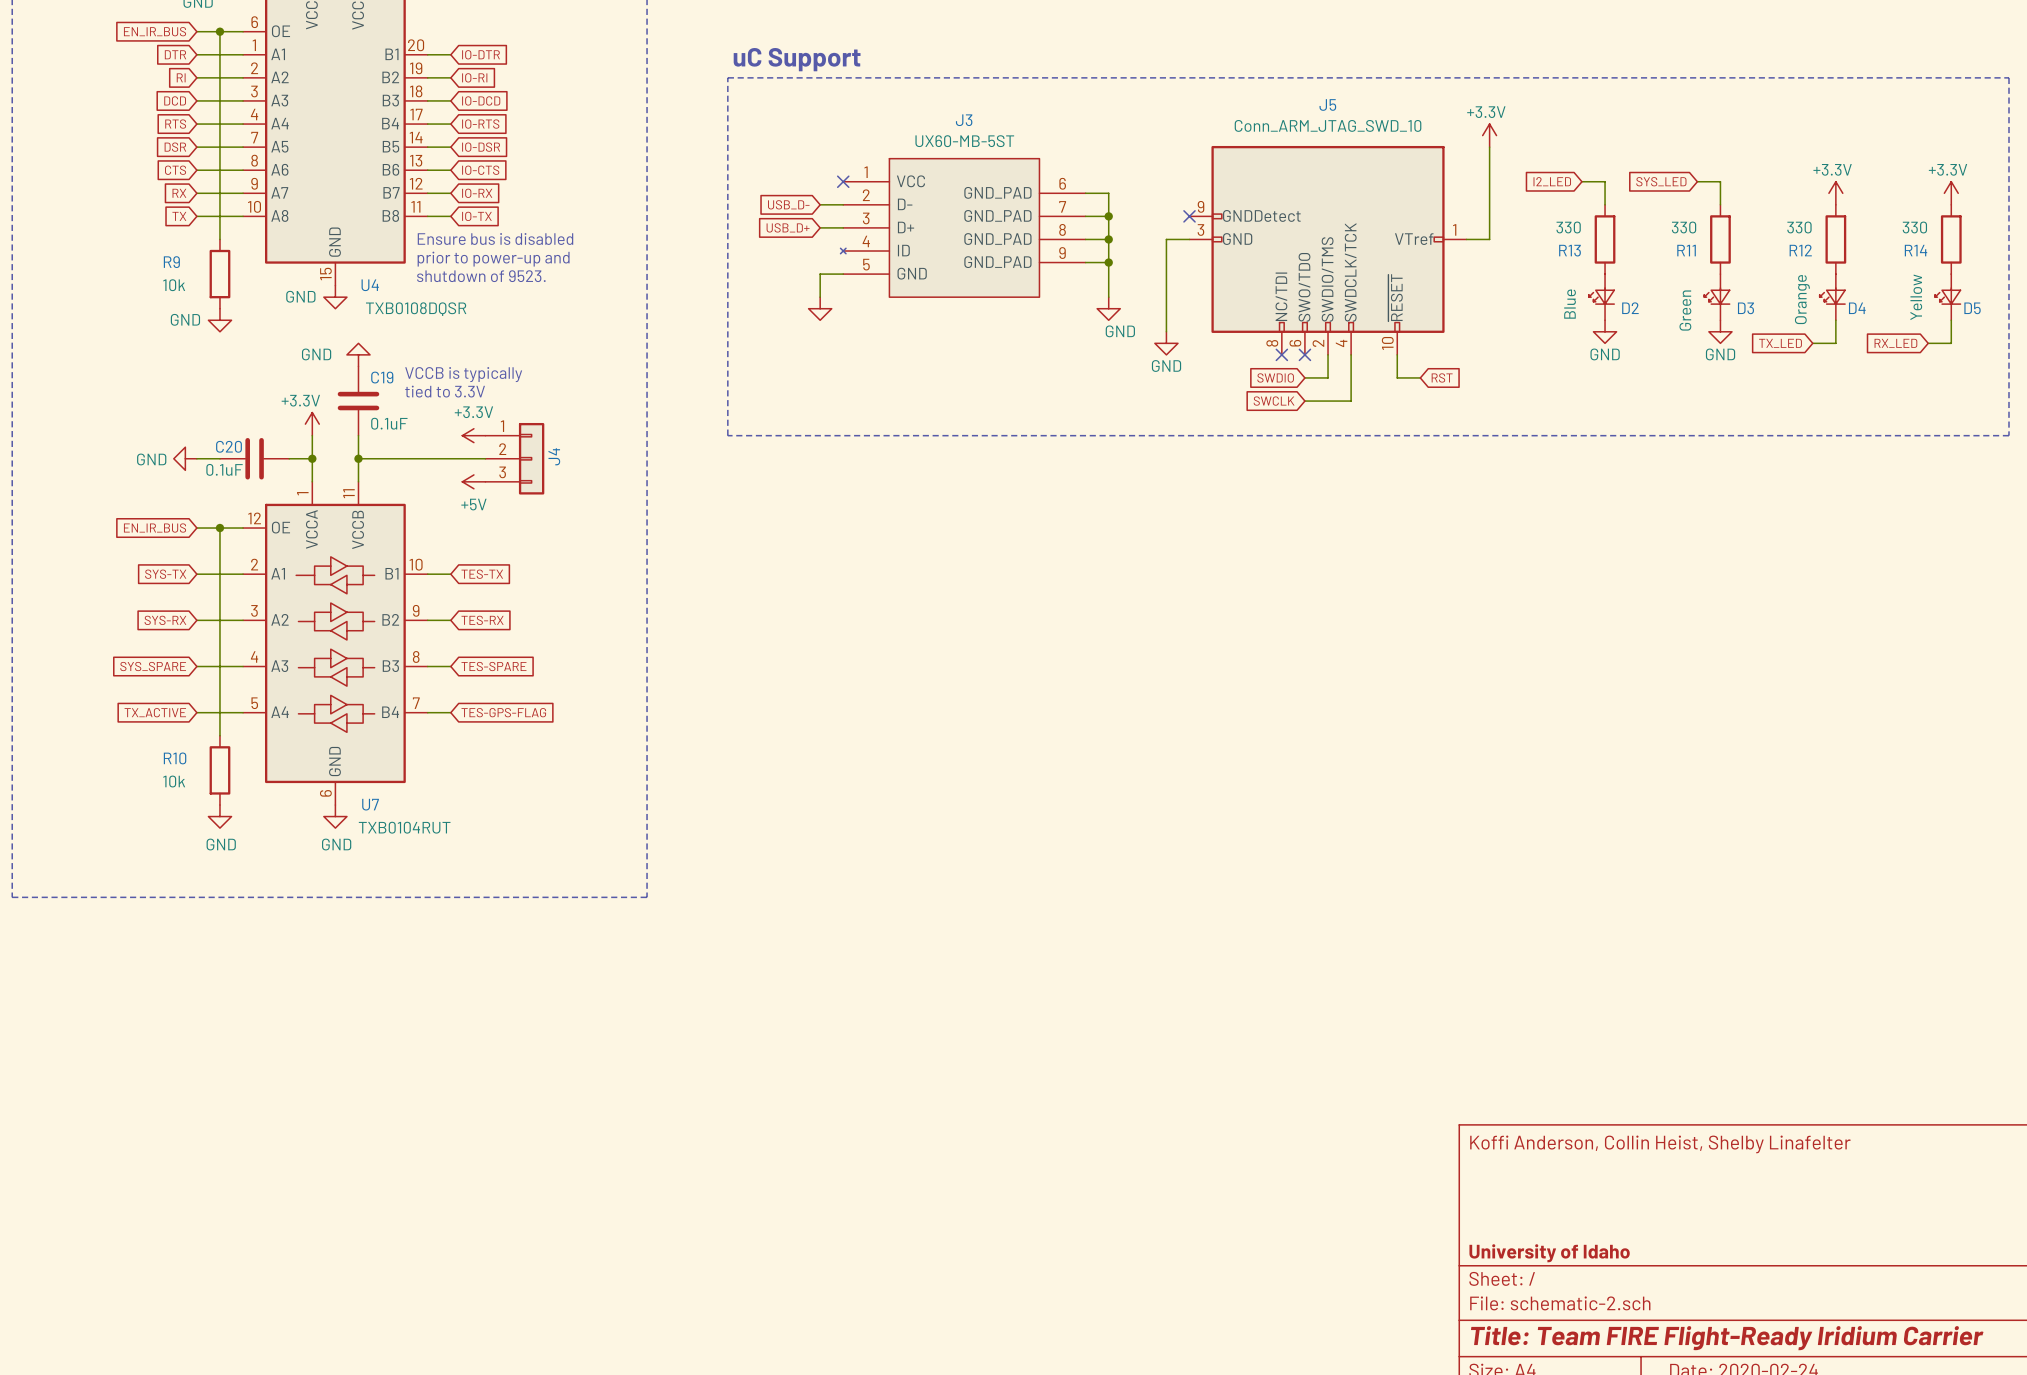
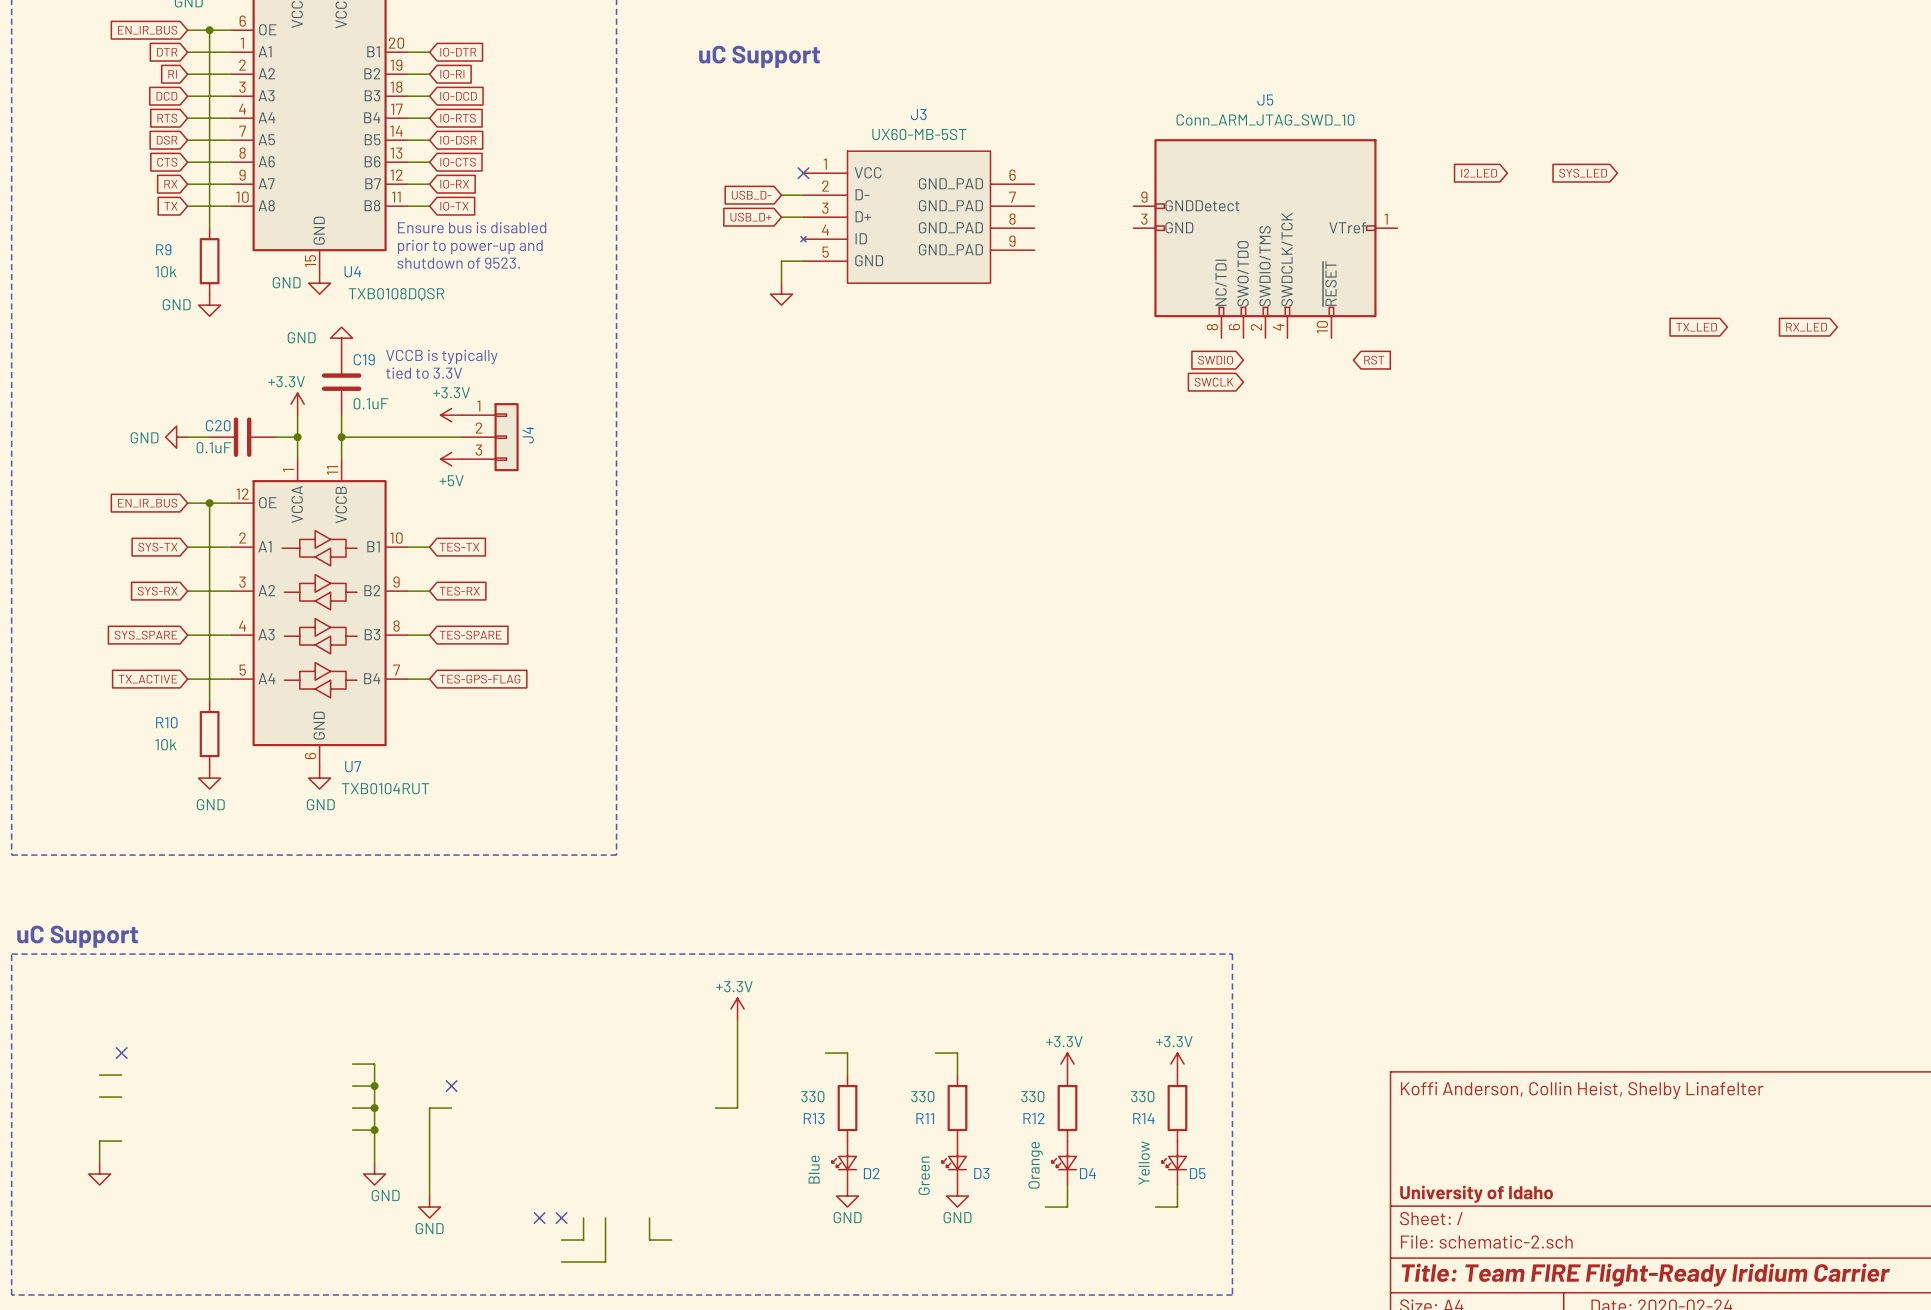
line: (727, 77) (727, 435) (2008, 435) (2008, 77) (727, 77) -> none
power symbol: +3.3V (1489, 135) -> none
wire: (1489, 147) (1489, 239) (1466, 239) -> none
wire: (1581, 181) (1605, 181) (1605, 204) -> none
wire: (1697, 181) (1720, 181) (1720, 204) -> none
wire: (1085, 193) (1108, 193) (1108, 297) -> none
power symbol: +3.3V (1835, 193) -> none
power symbol: +3.3V (1951, 193) -> none
wire: (1085, 216) (1108, 216) -> none
junction: (1108, 216) -> none
no-connect mark: (1189, 216) -> none
wire: (1085, 239) (1108, 239) -> none
junction: (1108, 239) -> none
wire: (1189, 239) (1166, 239) (1166, 331) -> none
R13 position: (1605, 239) -> (847, 1108)
R11 position: (1720, 239) -> (957, 1108)
R12 position: (1835, 239) -> (1067, 1108)
R14 position: (1951, 239) -> (1177, 1108)
wire: (1085, 262) (1108, 262) -> none
junction: (1108, 262) -> none
D2 position: (1601, 297) -> (844, 1163)
D3 position: (1716, 297) -> (954, 1163)
D4 position: (1832, 297) -> (1064, 1163)
D5 position: (1947, 297) -> (1174, 1163)
power symbol: GND (1108, 308) -> none
wire: (1835, 320) (1835, 343) (1812, 343) -> none
wire: (1951, 320) (1951, 343) (1928, 343) -> none
power symbol: GND (1605, 331) -> none
power symbol: GND (1720, 331) -> none
power symbol: GND (1166, 343) -> none
no-connect mark: (1281, 354) -> none
no-connect mark: (1304, 354) -> none
wire: (1328, 354) (1328, 377) (1304, 377) -> none
wire: (1351, 354) (1351, 401) (1304, 401) -> none
wire: (1397, 354) (1397, 377) (1420, 377) -> none
text: none -> uC Support (77, 936)
line: none -> (11, 954) (11, 1295) (1232, 1295) (1232, 954) (11, 954)
power symbol: none -> +3.3V (737, 1009)
wire: none -> (737, 1020) (737, 1108) (715, 1108)
no-connect mark: none -> (121, 1053)
wire: none -> (825, 1053) (847, 1053) (847, 1075)
wire: none -> (935, 1053) (957, 1053) (957, 1075)
wire: none -> (352, 1064) (374, 1064) (374, 1163)
power symbol: none -> +3.3V (1067, 1064)
power symbol: none -> +3.3V (1177, 1064)
wire: none -> (99, 1075) (121, 1075)
wire: none -> (352, 1086) (374, 1086)
junction: none -> (374, 1086)
no-connect mark: none -> (451, 1086)
wire: none -> (99, 1097) (121, 1097)
wire: none -> (352, 1108) (374, 1108)
junction: none -> (374, 1108)
wire: none -> (451, 1108) (429, 1108) (429, 1196)
wire: none -> (352, 1130) (374, 1130)
junction: none -> (374, 1130)
wire: none -> (121, 1141) (99, 1141) (99, 1163)
power symbol: none -> (99, 1174)
power symbol: none -> GND (374, 1174)
wire: none -> (1067, 1185) (1067, 1207) (1045, 1207)
wire: none -> (1177, 1185) (1177, 1207) (1155, 1207)
power symbol: none -> GND (847, 1196)
power symbol: none -> GND (957, 1196)
power symbol: none -> GND (429, 1207)
no-connect mark: none -> (539, 1218)
no-connect mark: none -> (561, 1218)
wire: none -> (583, 1218) (583, 1240) (561, 1240)
wire: none -> (605, 1218) (605, 1262) (561, 1262)
wire: none -> (649, 1218) (649, 1240) (671, 1240)

